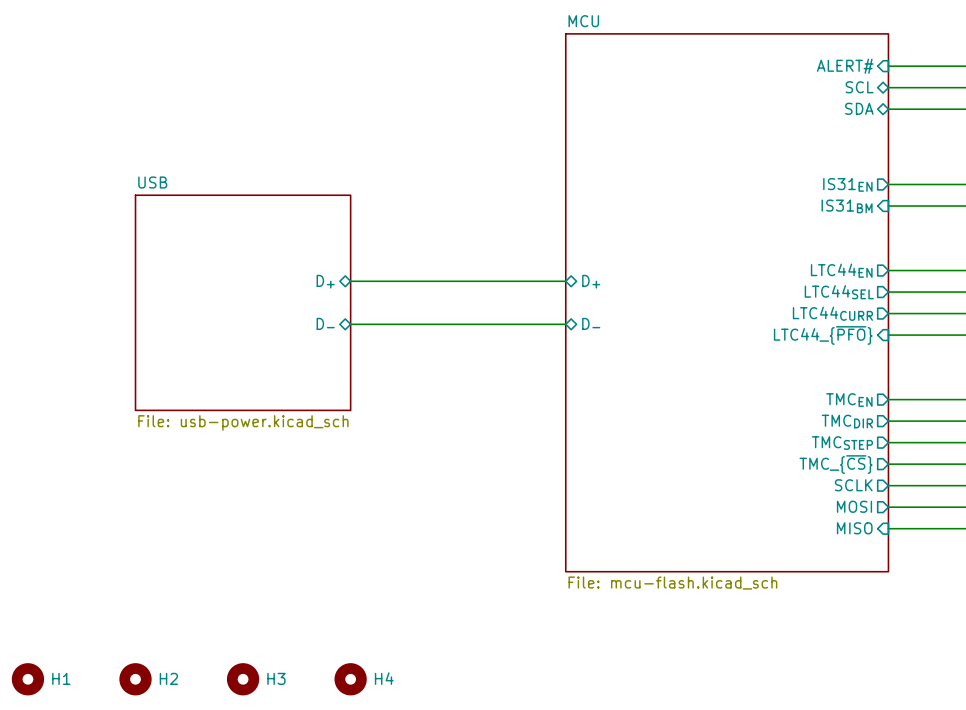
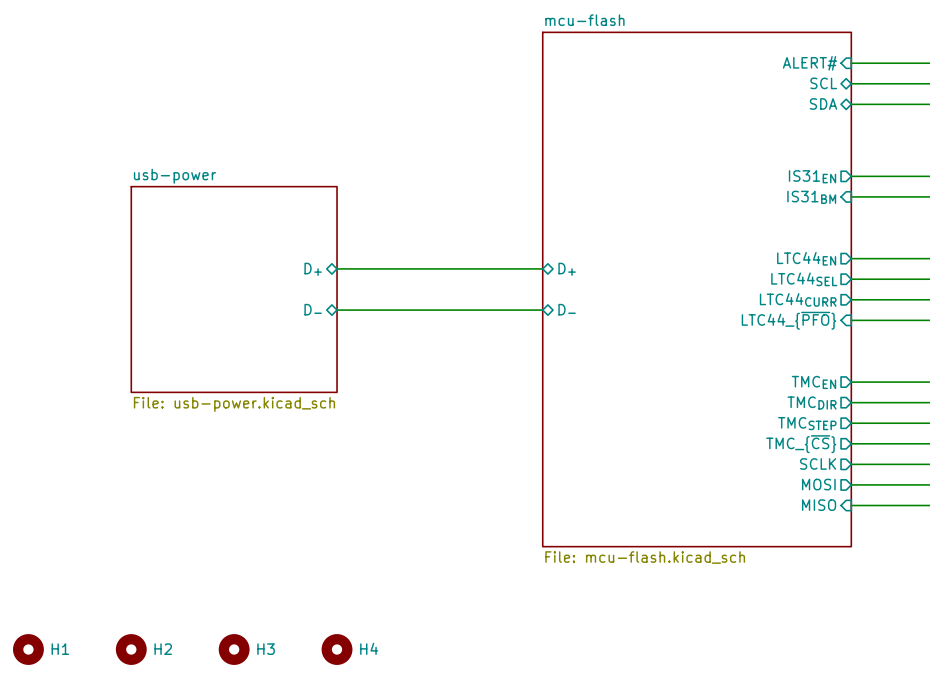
sheet MCU name: MCU (583, 21) -> mcu-flash (584, 20)
sheet USB name: USB (152, 182) -> usb-power (174, 176)

